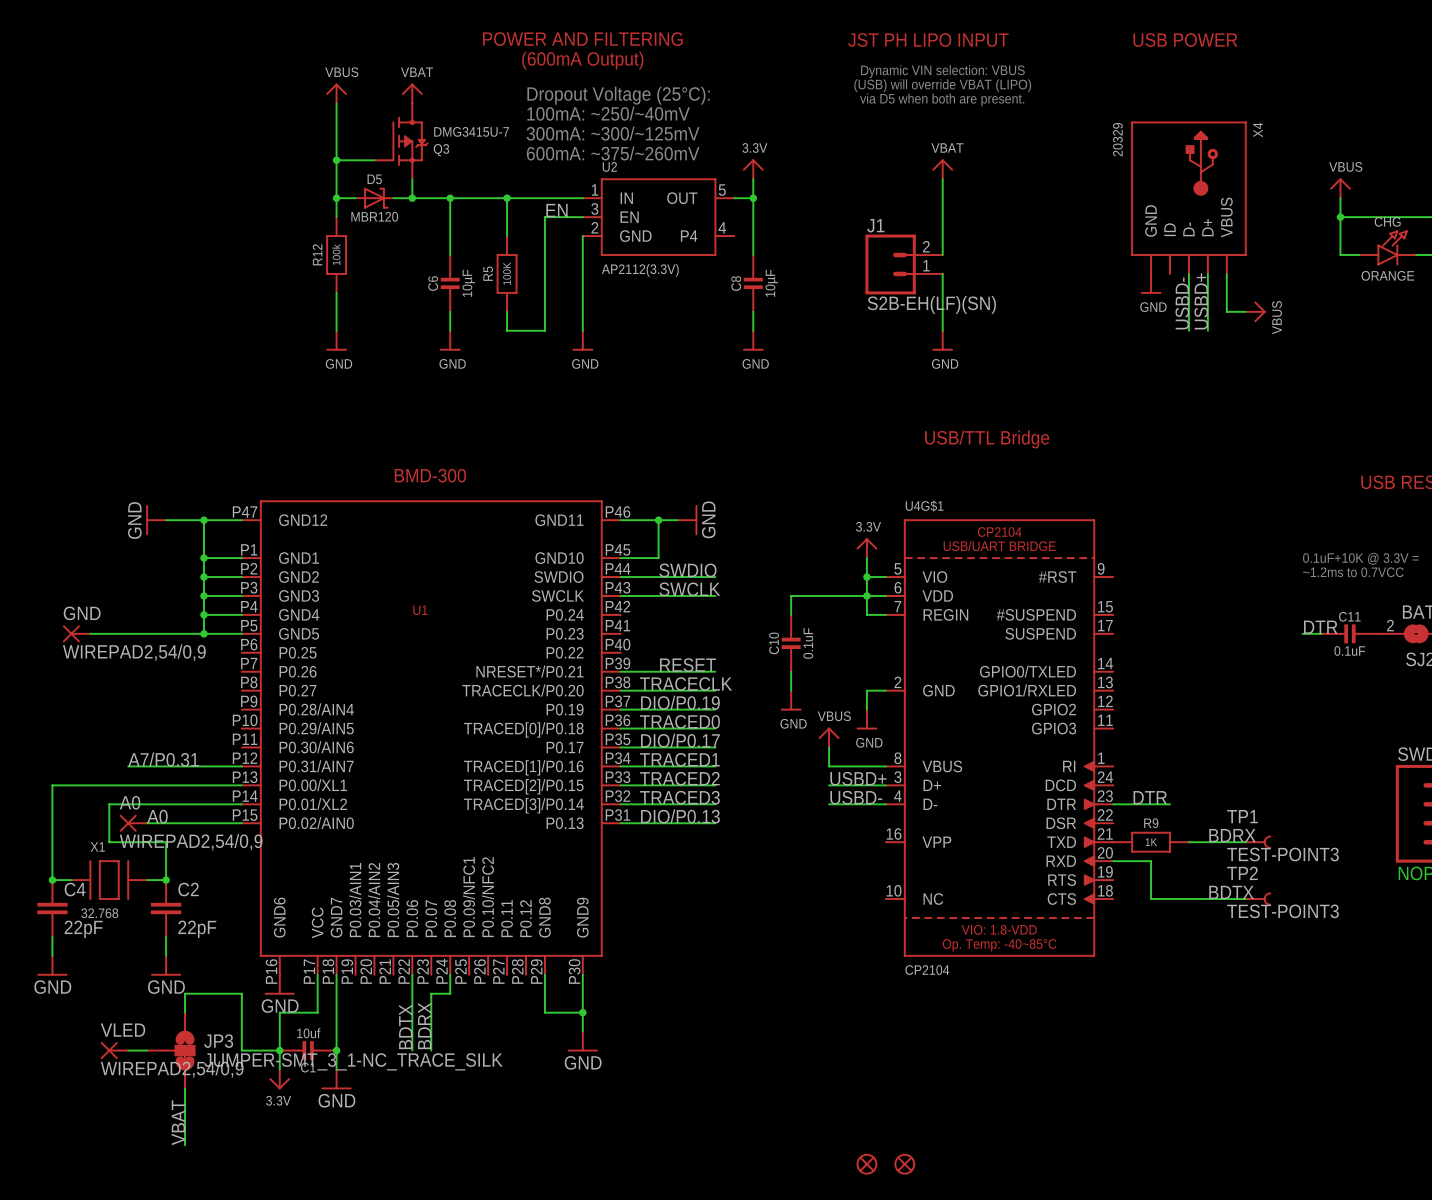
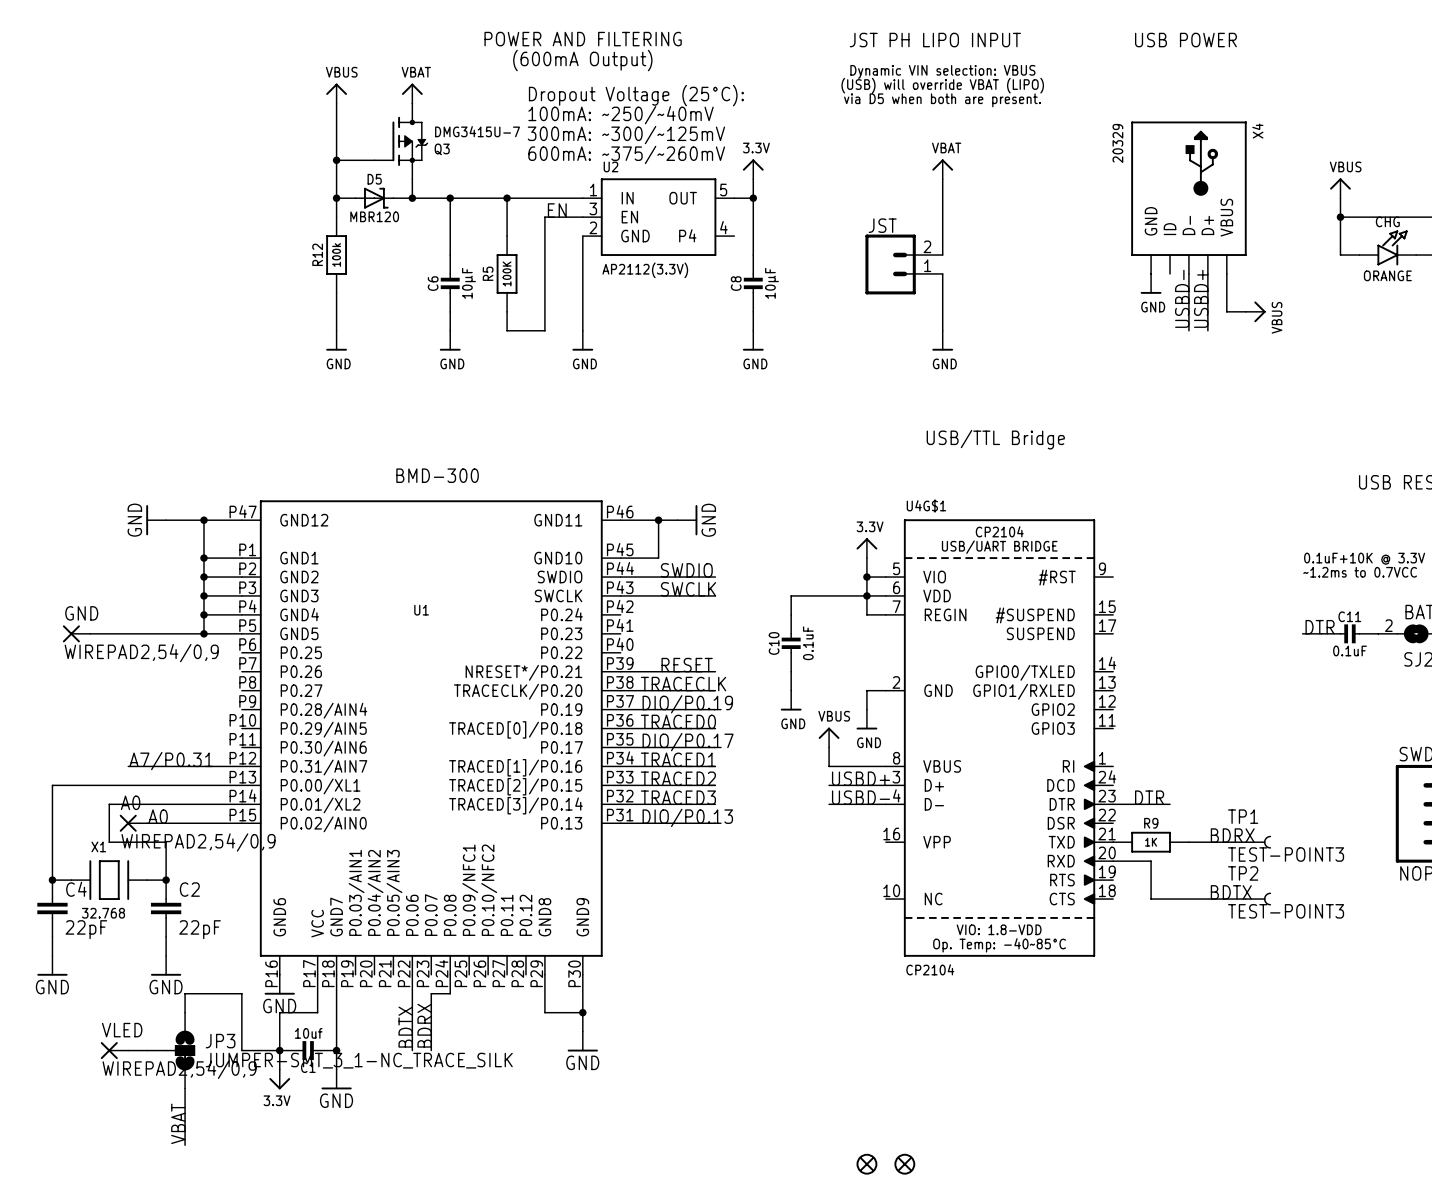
J1 name: J1 (875, 225) -> JST (882, 225)
J1 value: S2B-EH(LF)(SN) (931, 304) -> none

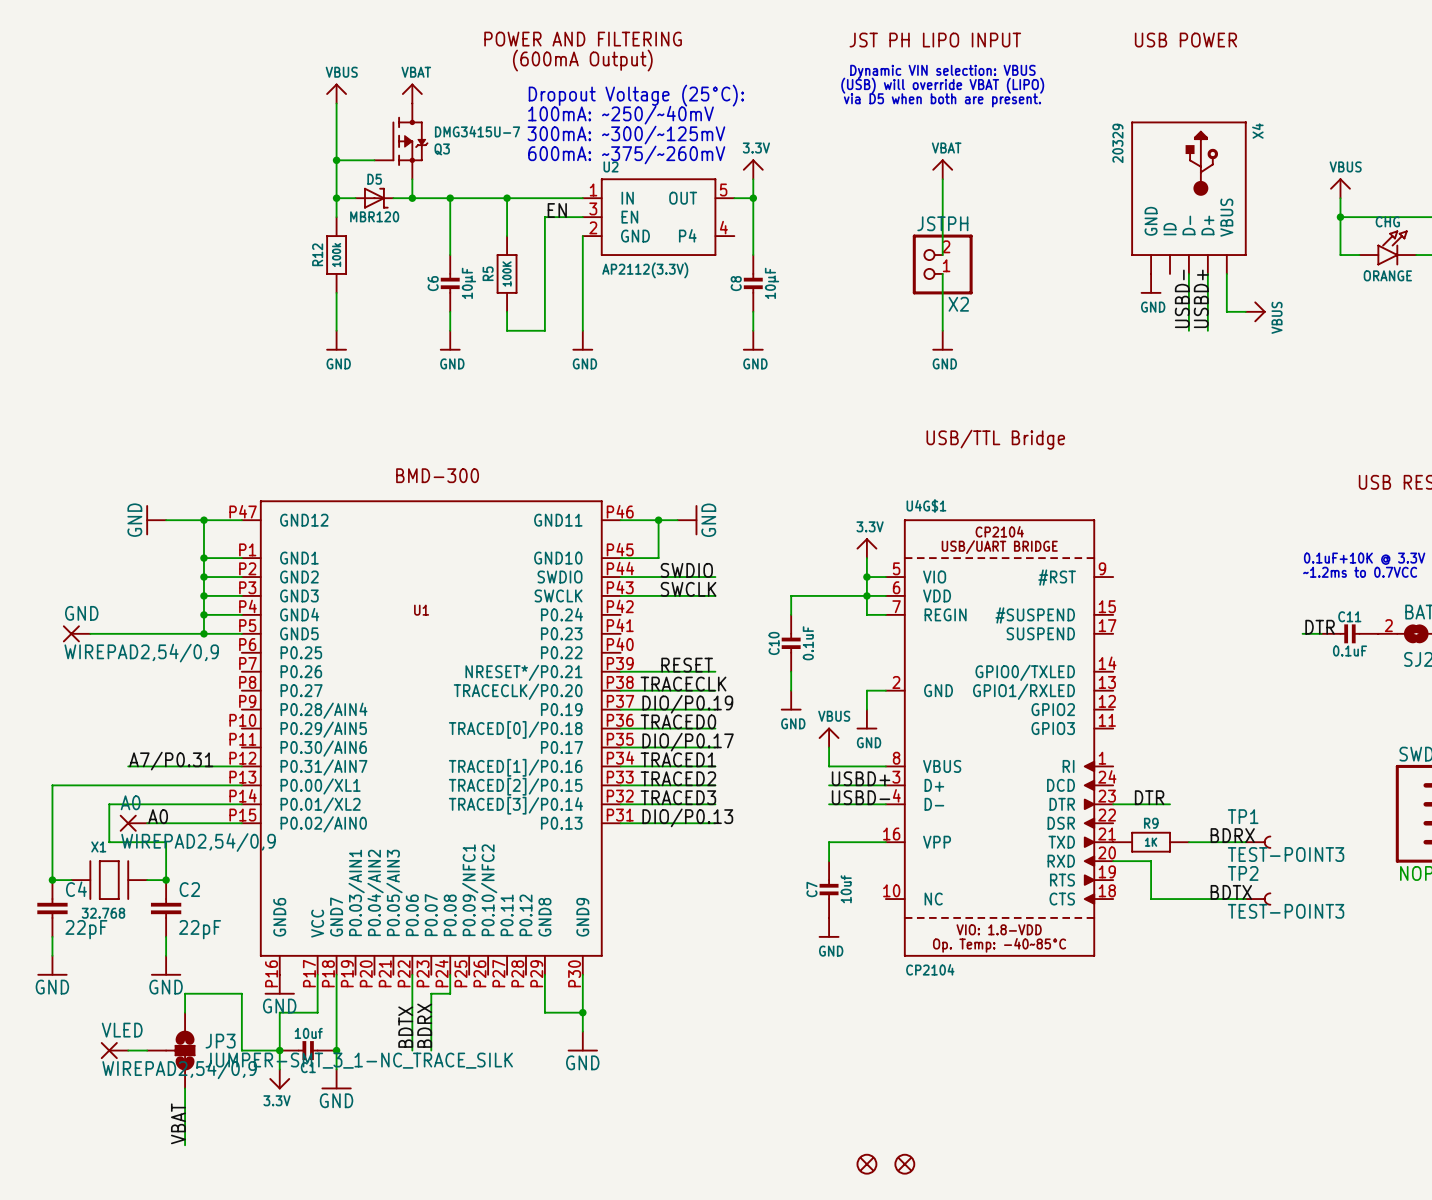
JST: (904, 264) -> none
X2: none -> JSTPH (942, 264)
wire: none -> (885, 842) (829, 842) (829, 861)
C7: none -> 10uf (829, 889)
power symbol: none -> GND (829, 927)

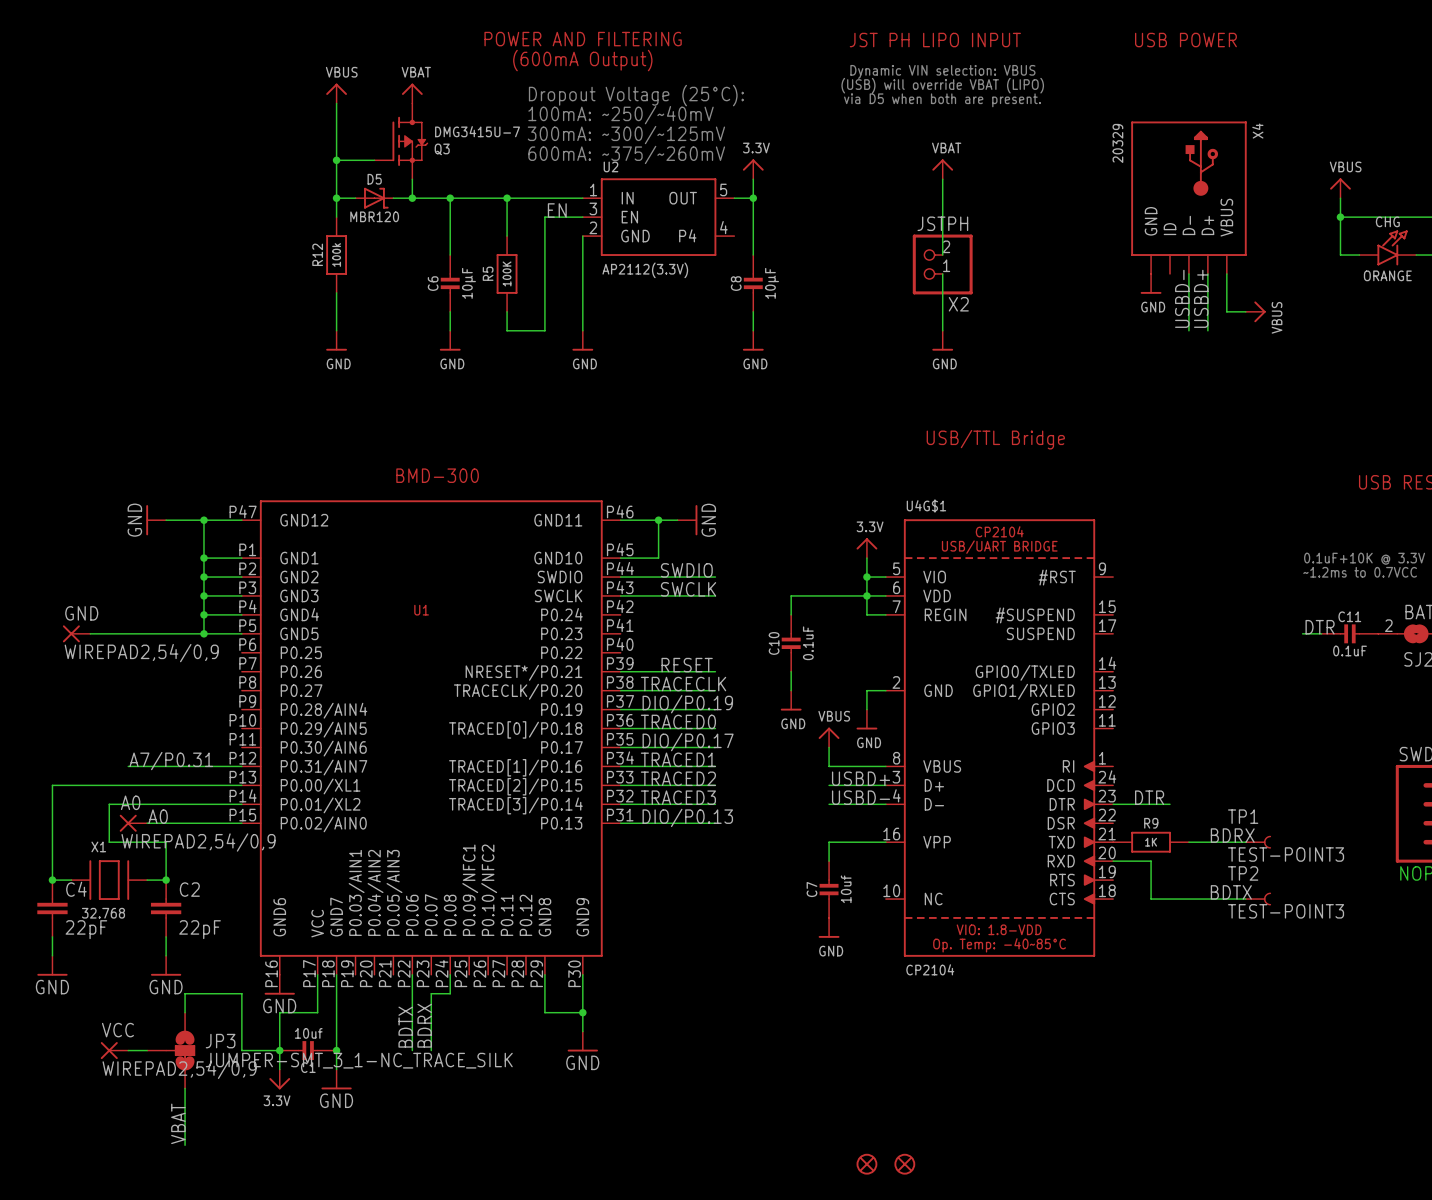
VLED name: VLED (122, 1030) -> VCC (117, 1030)

